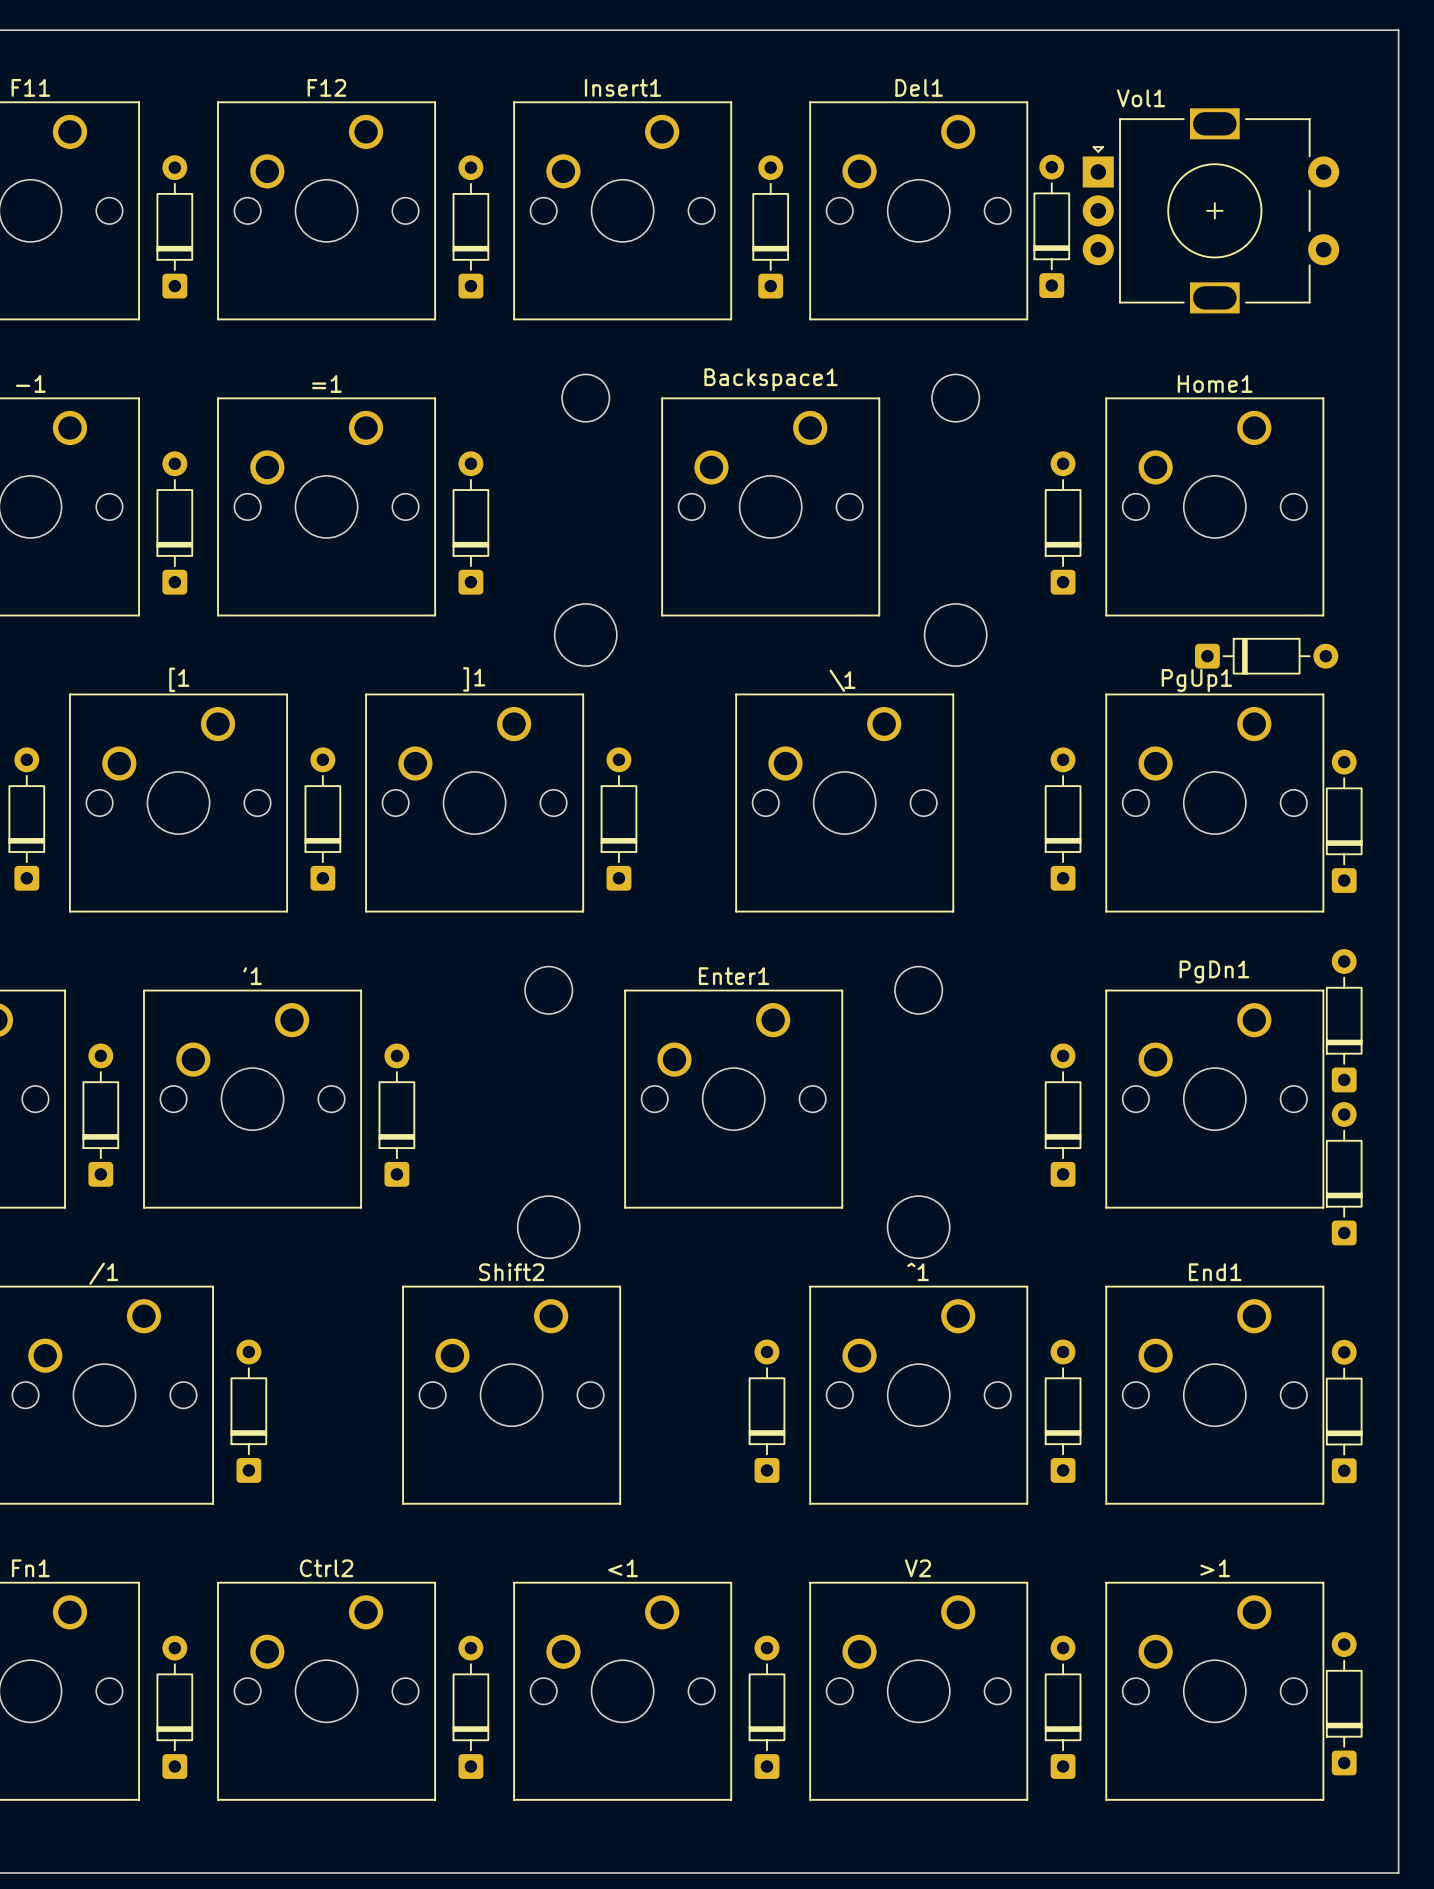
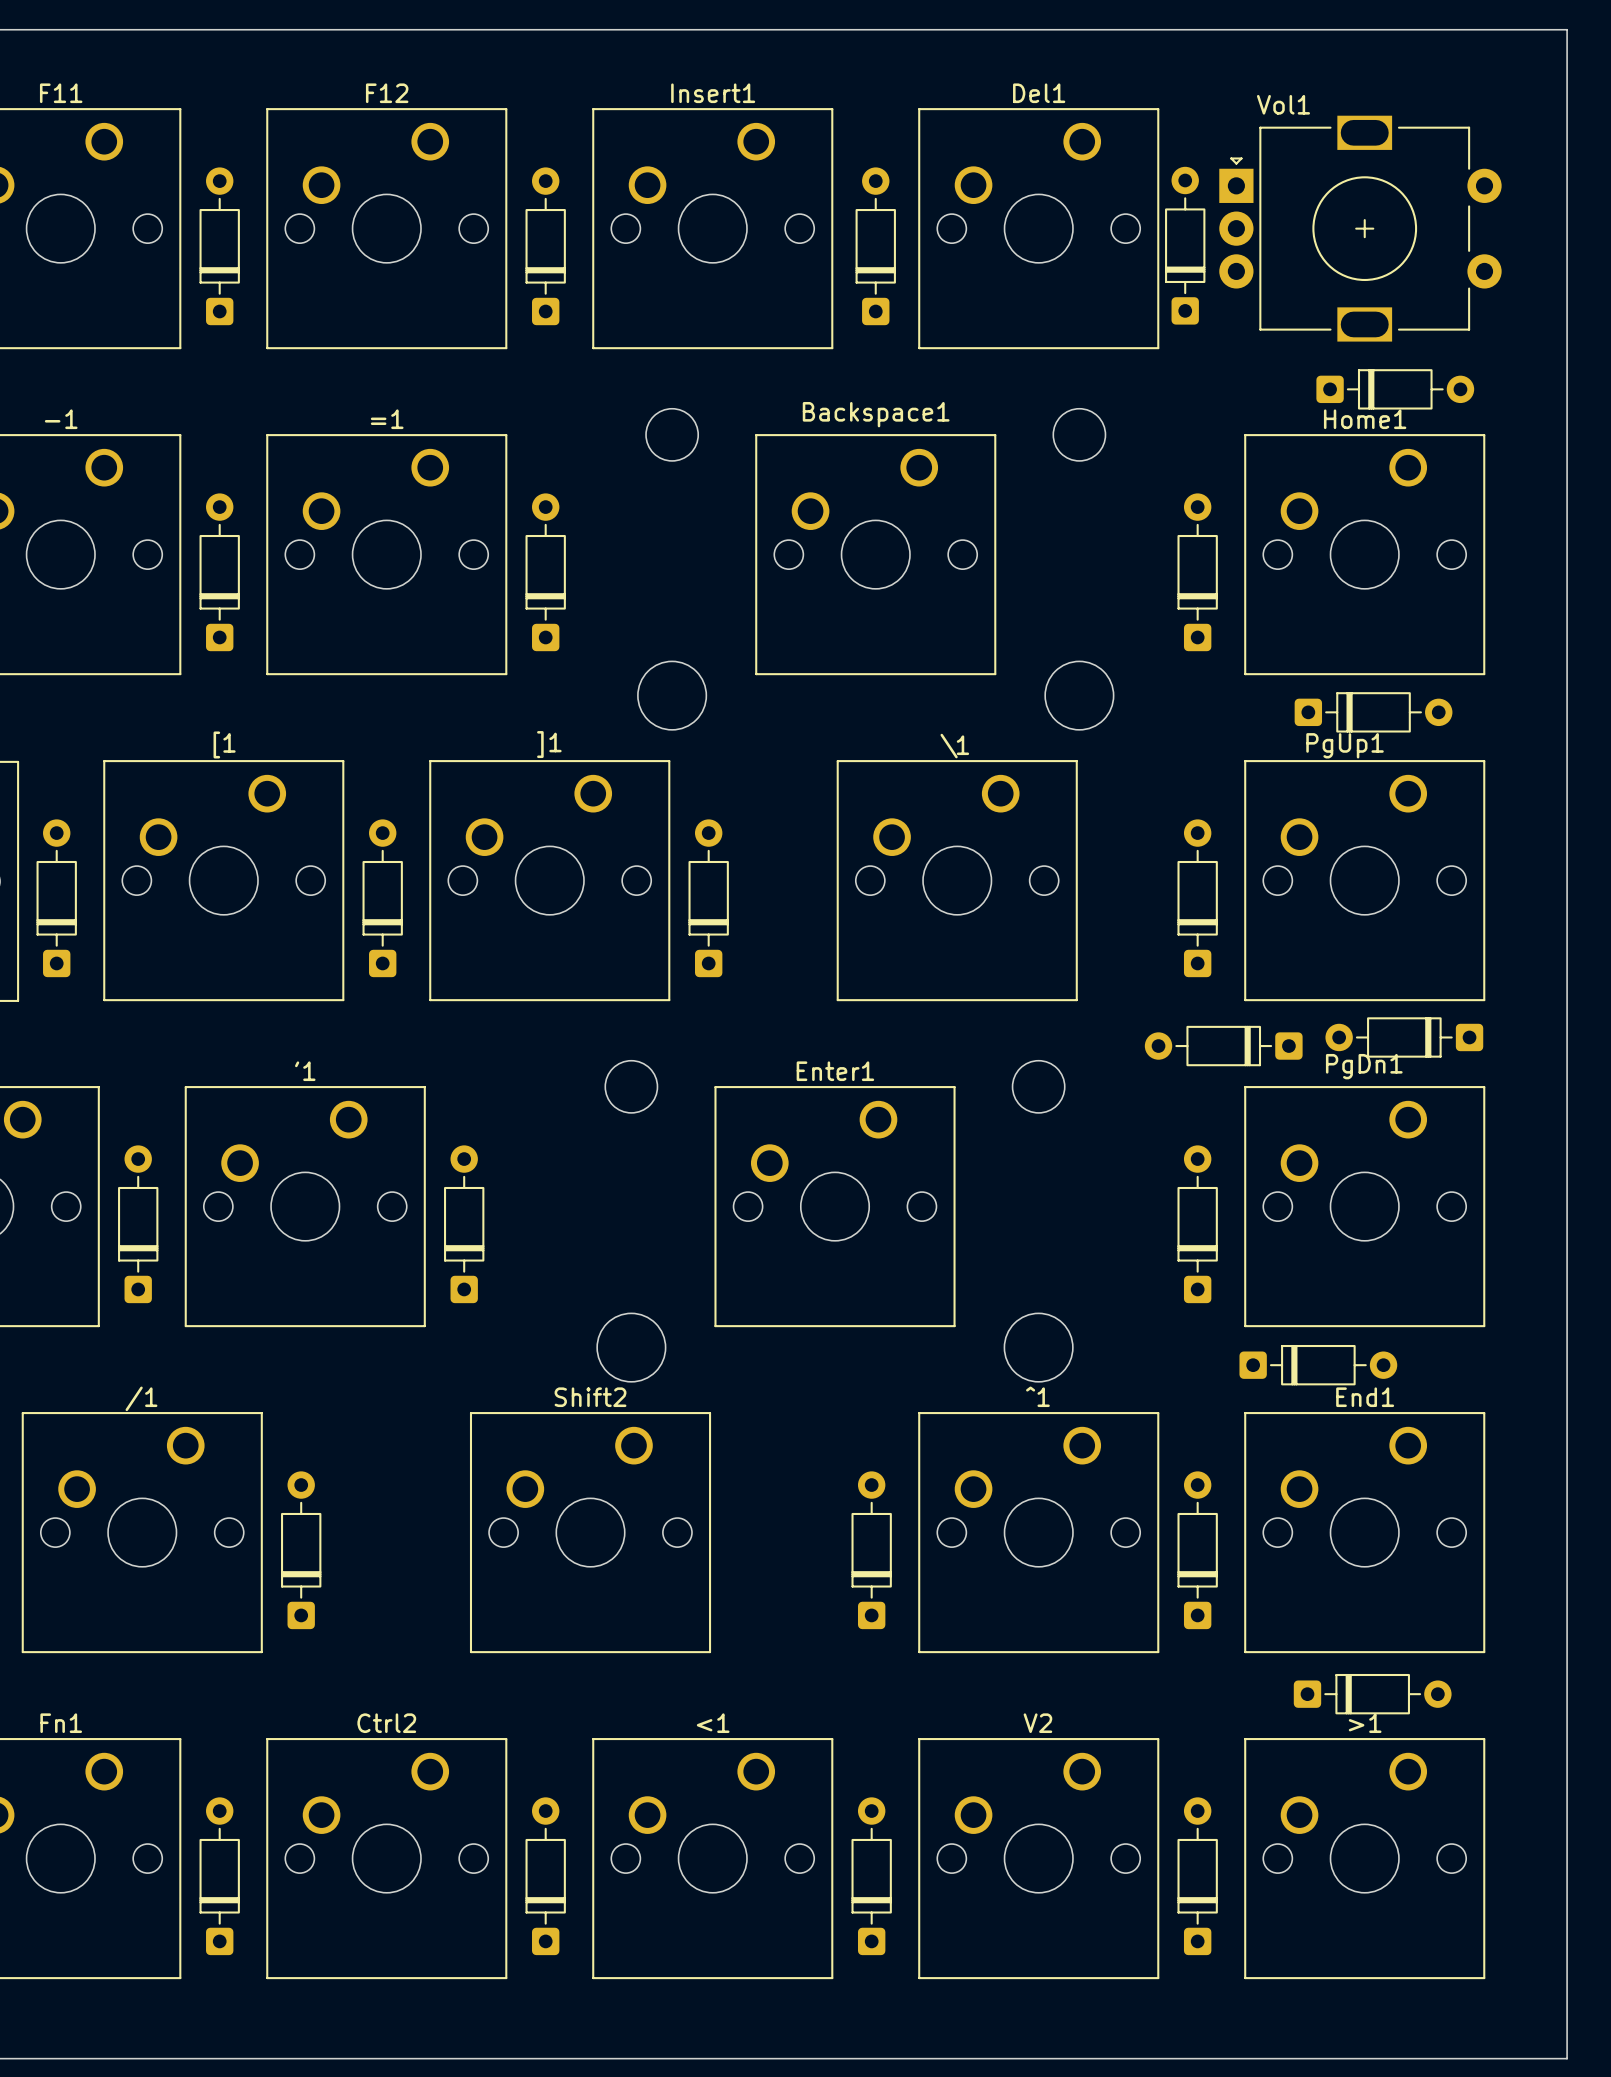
part: none -> (1395, 389)
part position: (1266, 656) -> (1373, 712)
part: (1344, 821) -> none
part: none -> (1404, 1037)
part: none -> (1223, 1046)
part: (1344, 1020) -> none
part: (1344, 1173) -> none
part: none -> (1318, 1365)
part: (1344, 1411) -> none
part: none -> (1372, 1694)
part: (1344, 1703) -> none

